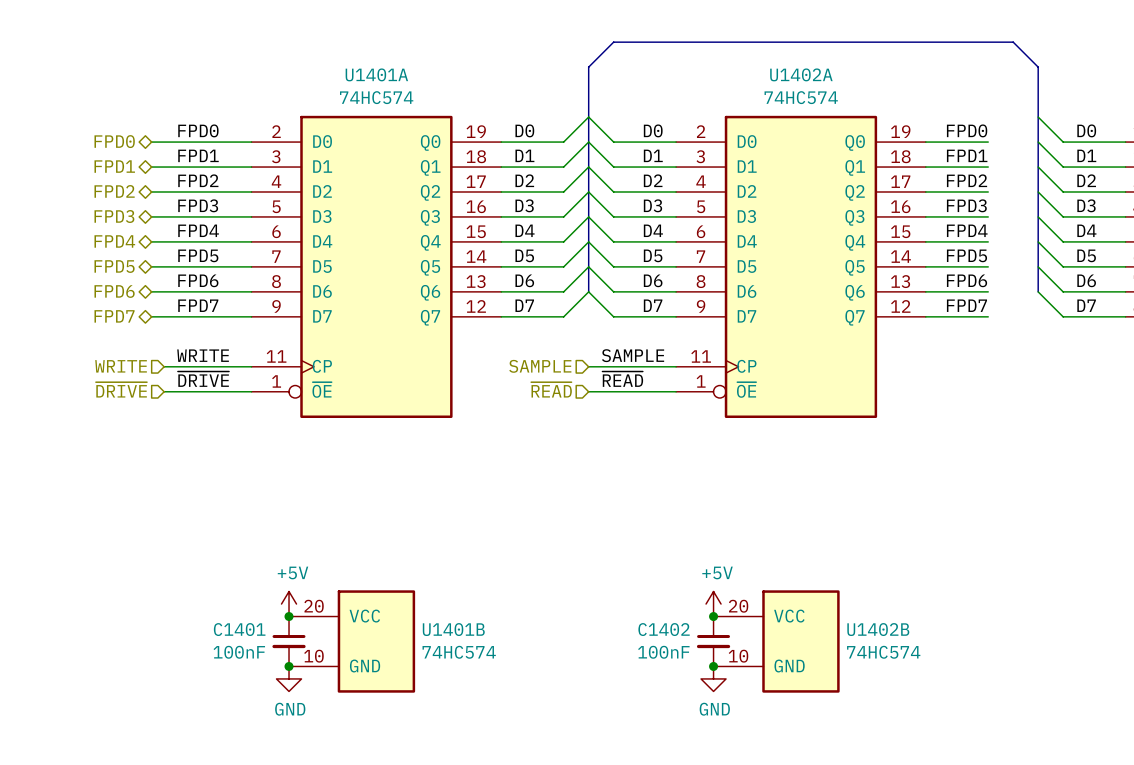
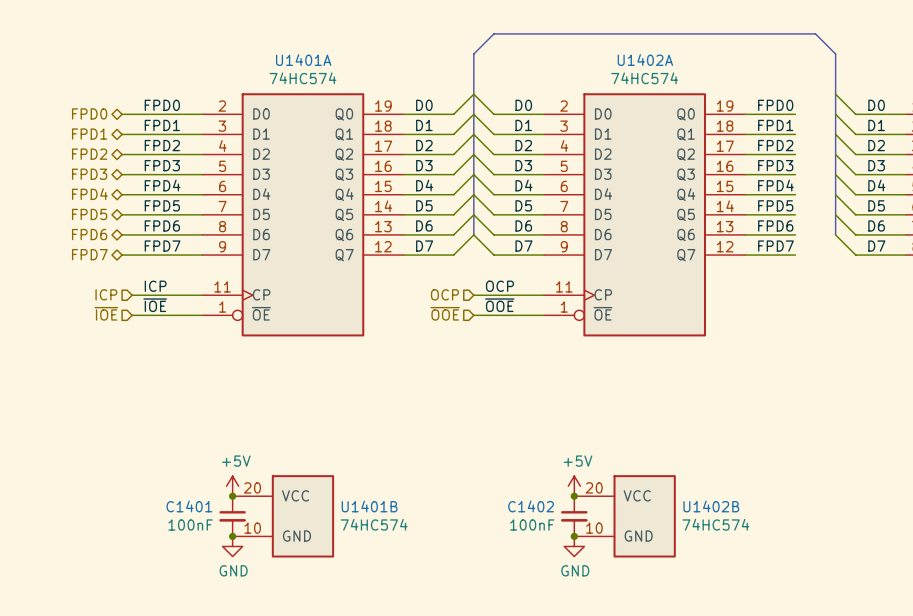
label: WRITE (203, 355) -> ICP (155, 286)
label: SAMPLE (633, 355) -> OCP (499, 286)
hierarchical label: WRITE (121, 366) -> ICP (106, 294)
hierarchical label: SAMPLE (540, 366) -> OCP (444, 294)
label: ~{DRIVE} (203, 379) -> ~{IOE} (155, 305)
label: ~{READ} (622, 379) -> ~{OOE} (499, 305)
hierarchical label: ~{DRIVE} (121, 389) -> ~{IOE} (106, 313)
hierarchical label: ~{READ} (551, 389) -> ~{OOE} (445, 313)

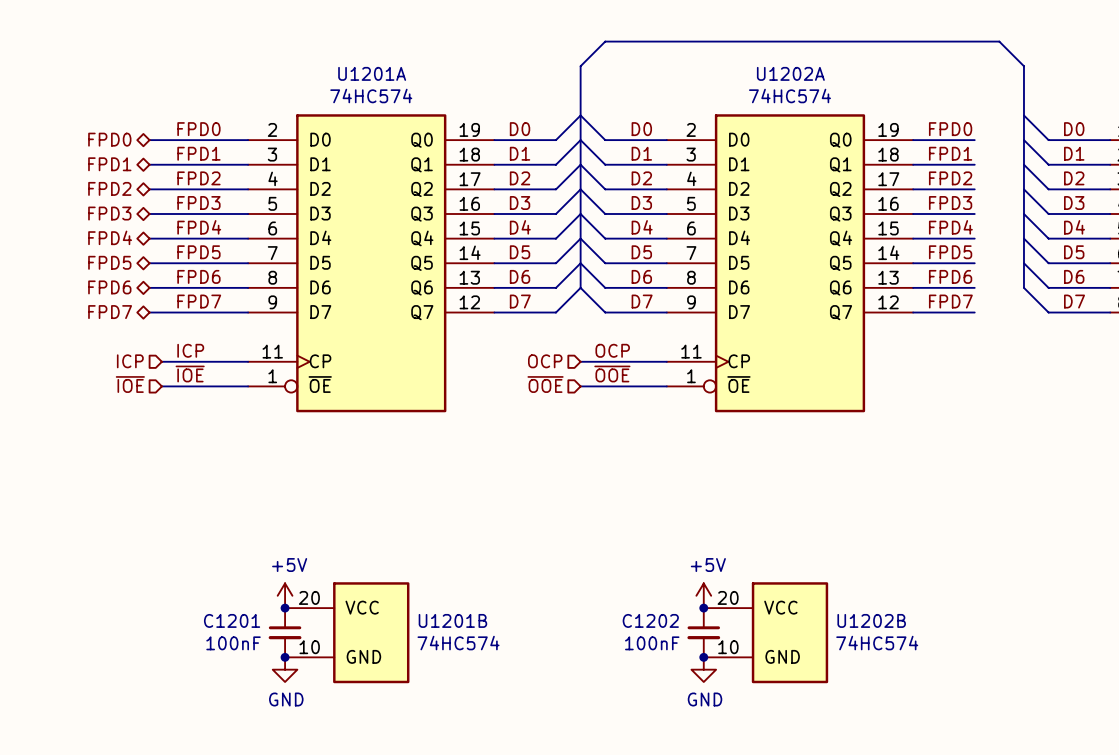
U1401A name: U1401A (303, 60) -> U1201A (372, 73)
U1402A name: U1402A (645, 60) -> U1202A (790, 73)
C1401 name: C1401 (189, 506) -> C1201 (232, 620)
U1401B name: U1401B (369, 506) -> U1201B (452, 620)
C1402 name: C1402 (531, 506) -> C1202 (650, 620)
U1402B name: U1402B (711, 506) -> U1202B (871, 620)

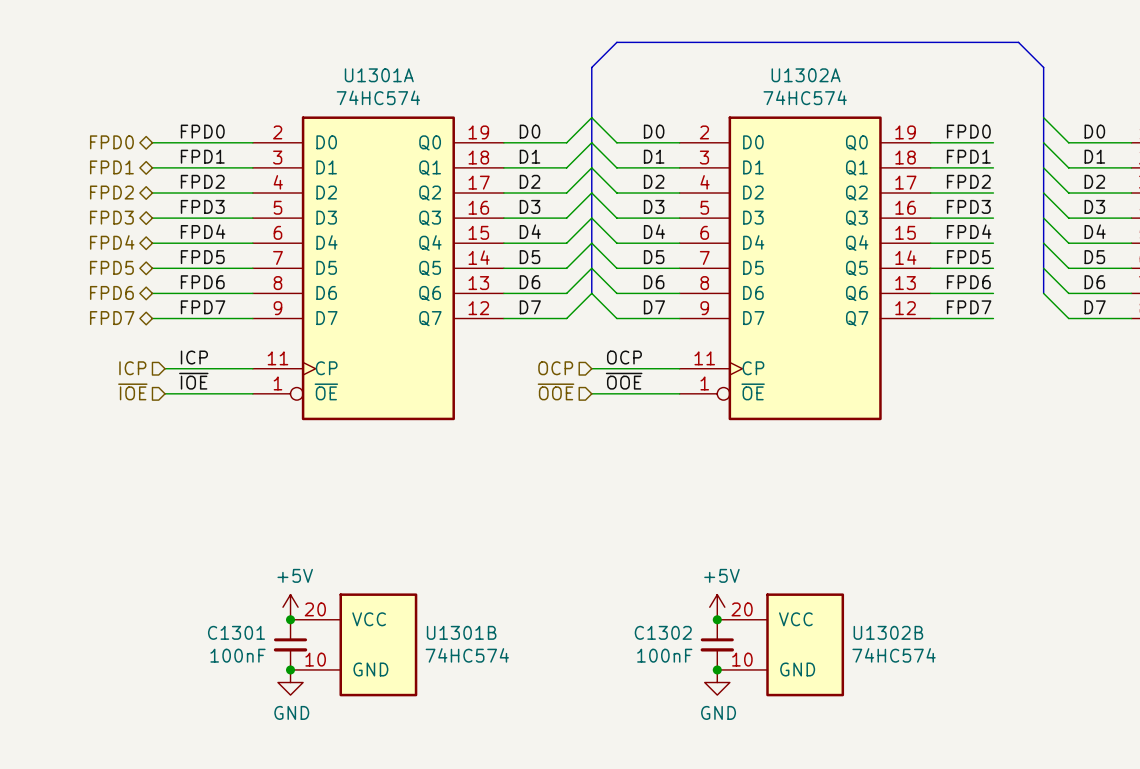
U1201A name: U1201A (372, 73) -> U1301A (379, 75)
U1202A name: U1202A (790, 73) -> U1302A (806, 75)
C1201 name: C1201 (232, 620) -> C1301 (236, 632)
U1201B name: U1201B (452, 620) -> U1301B (461, 632)
C1202 name: C1202 (650, 620) -> C1302 (663, 632)
U1202B name: U1202B (871, 620) -> U1302B (888, 632)

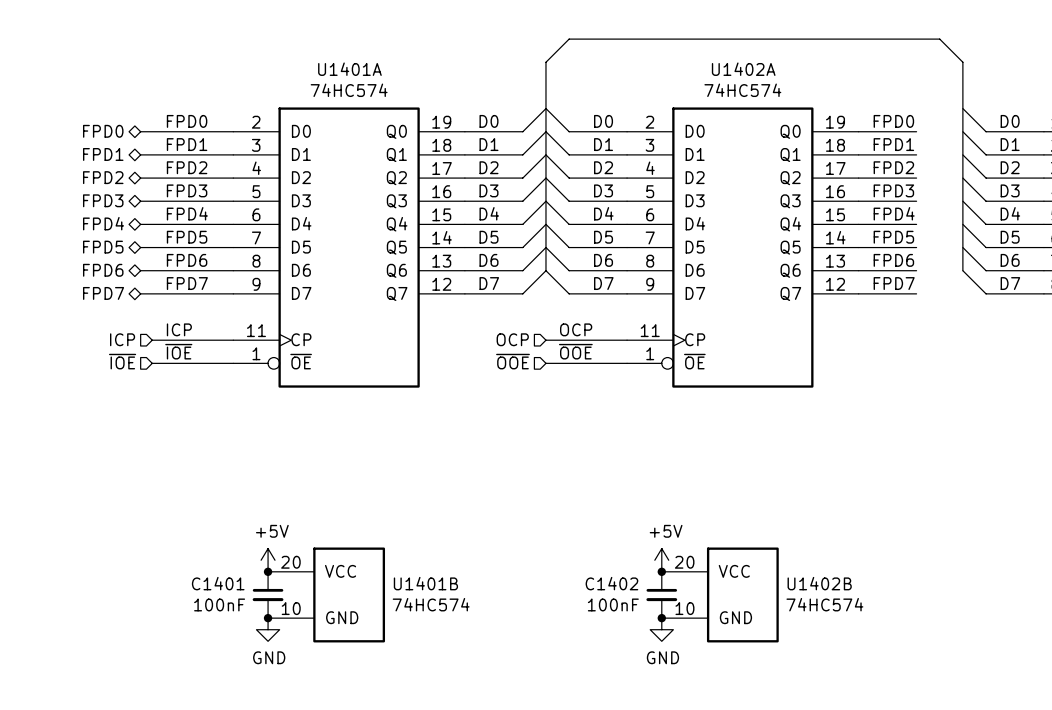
U1301A name: U1301A (379, 75) -> U1401A (349, 69)
U1302A name: U1302A (806, 75) -> U1402A (743, 69)
C1301 name: C1301 (236, 632) -> C1401 (218, 583)
U1301B name: U1301B (461, 632) -> U1401B (425, 583)
C1302 name: C1302 (663, 632) -> C1402 (611, 583)
U1302B name: U1302B (888, 632) -> U1402B (819, 583)

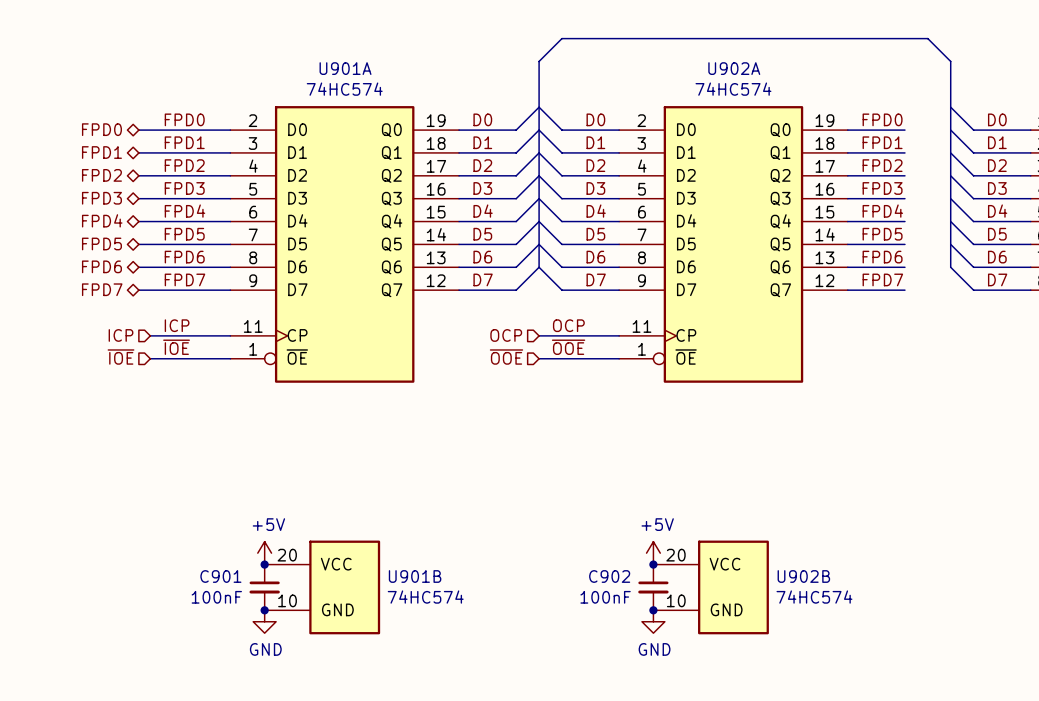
U1401A name: U1401A (349, 69) -> U901A (345, 68)
U1402A name: U1402A (743, 69) -> U902A (734, 68)
C1401 name: C1401 (218, 583) -> C901 (220, 576)
U1401B name: U1401B (425, 583) -> U901B (415, 576)
C1402 name: C1402 (611, 583) -> C902 (609, 576)
U1402B name: U1402B (819, 583) -> U902B (803, 576)

